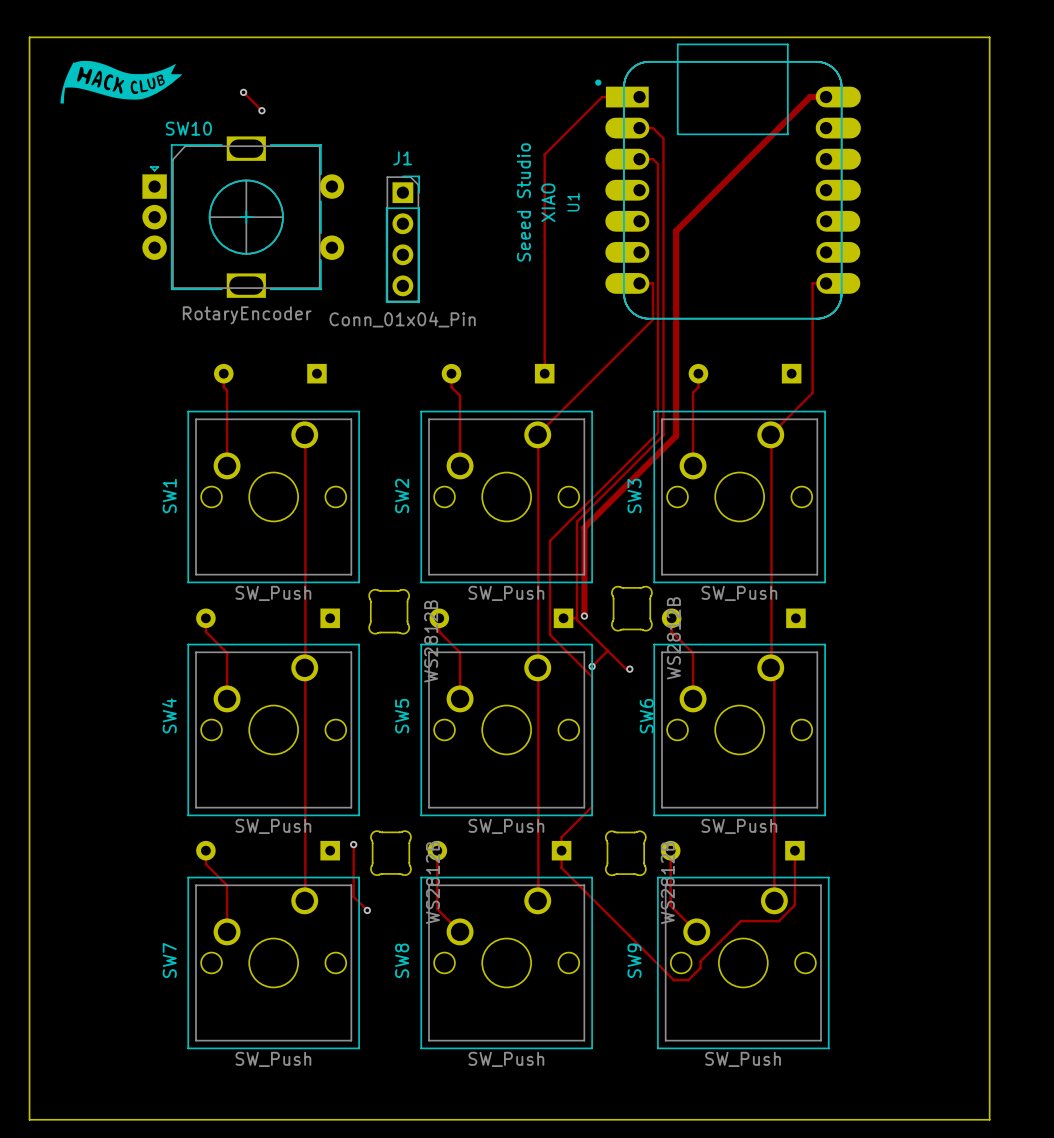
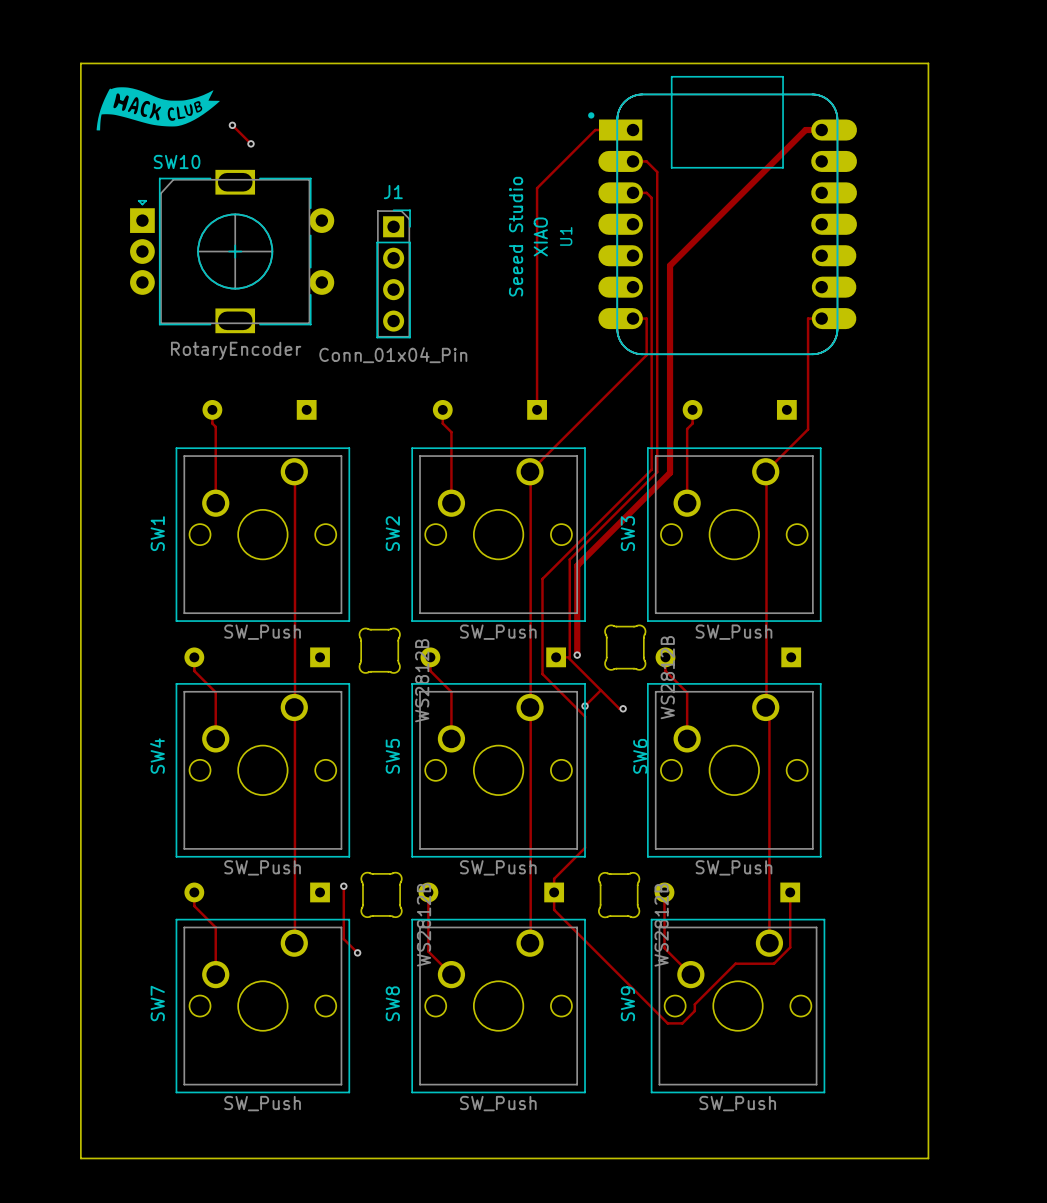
board edge: (29, 37) (989, 37) (989, 1119) (29, 1119) (29, 37) -> (80, 63) (80, 1158) (928, 1158) (928, 63) (80, 63)
drawing position: (121, 82) -> (158, 108)

